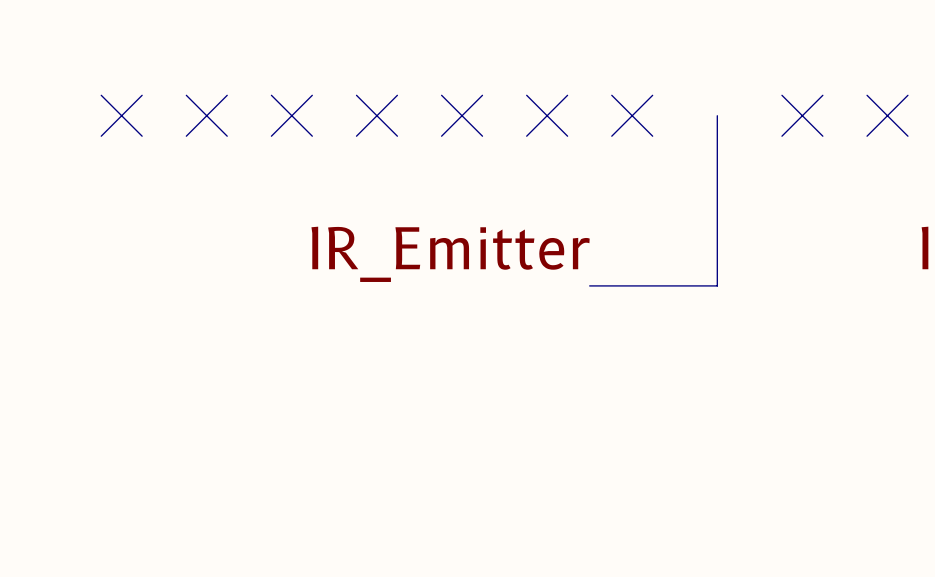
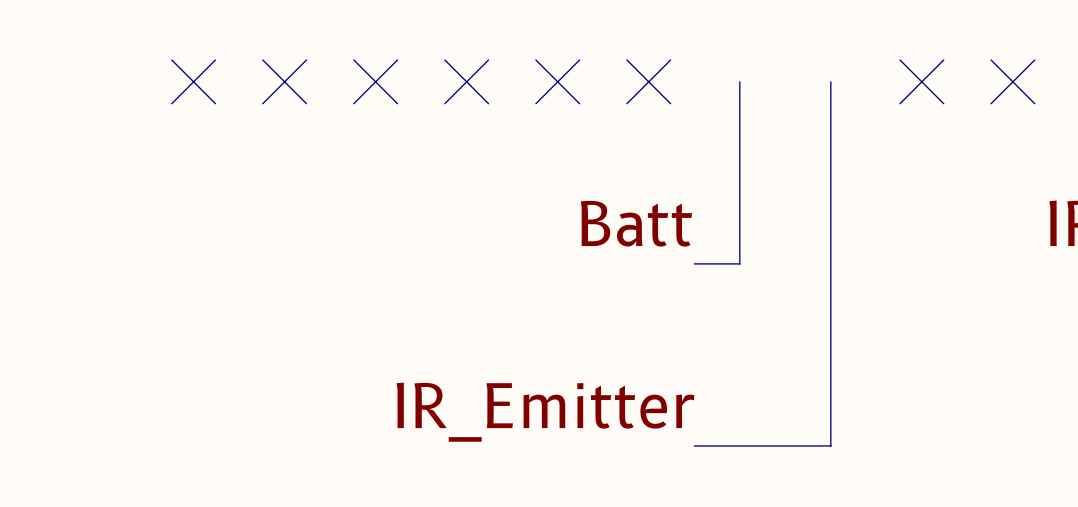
wire: none -> (739, 81) (739, 263)
no-connect mark: (632, 115) -> none
label: IR_Emitter (450, 254) -> Batt (636, 223)
wire: (632, 285) (717, 285) -> (694, 445) (830, 445) (830, 263)
label: none -> IR_Emitter (545, 412)

